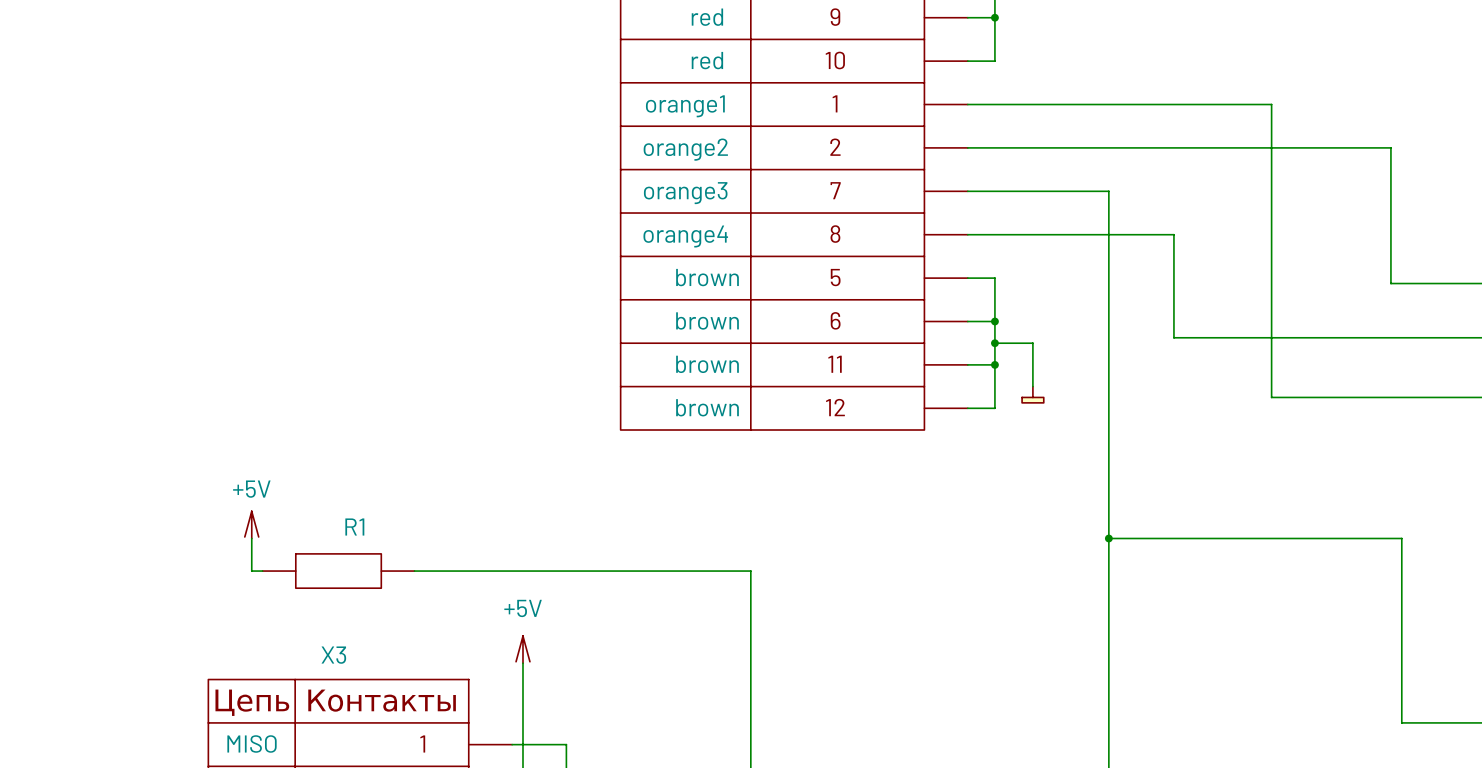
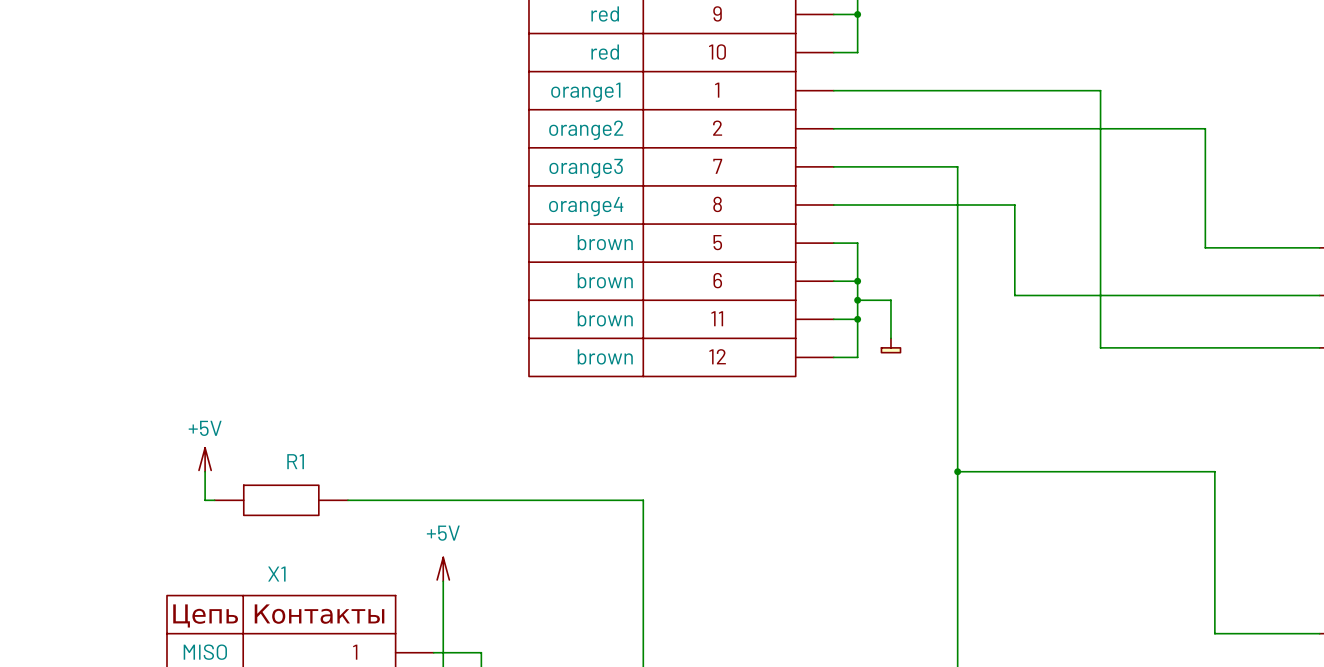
X3 name: X3 (333, 655) -> X1 (276, 574)

